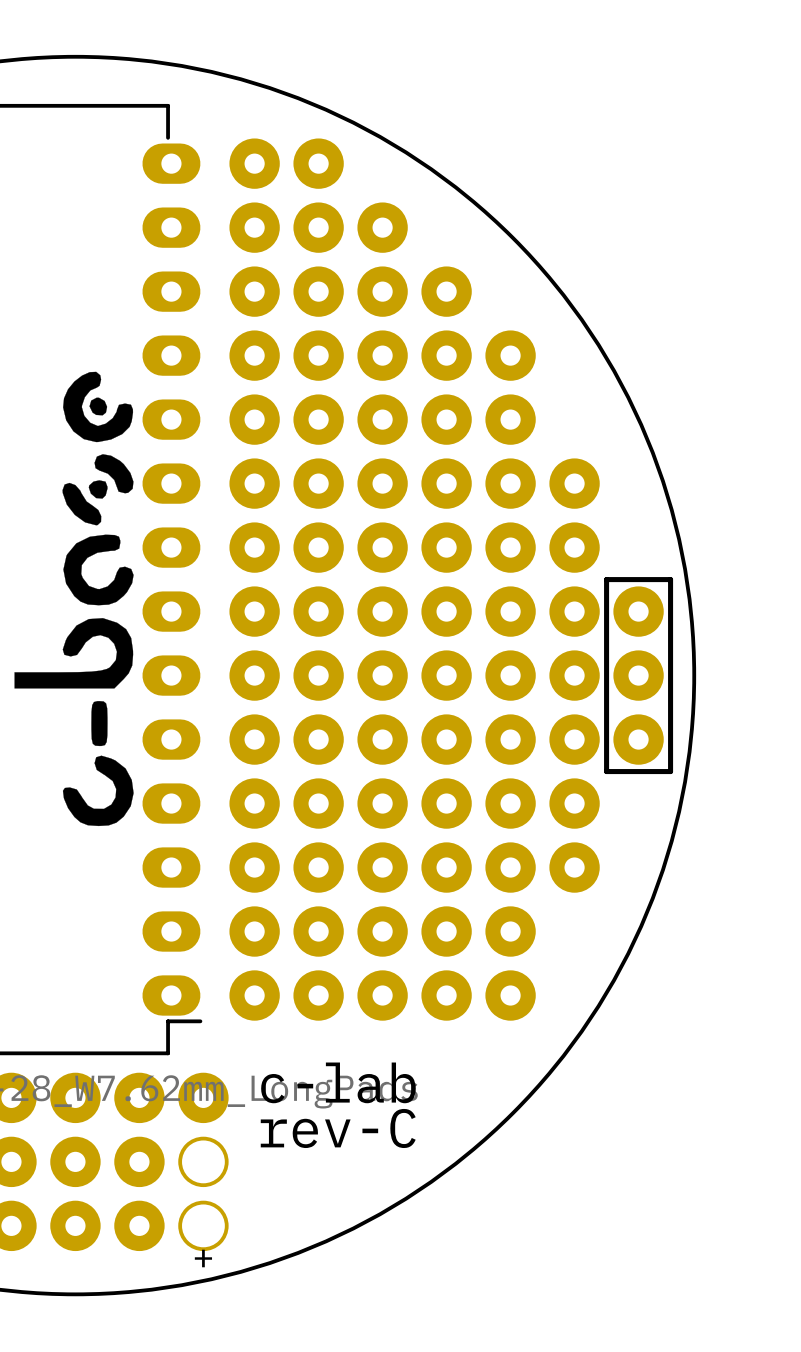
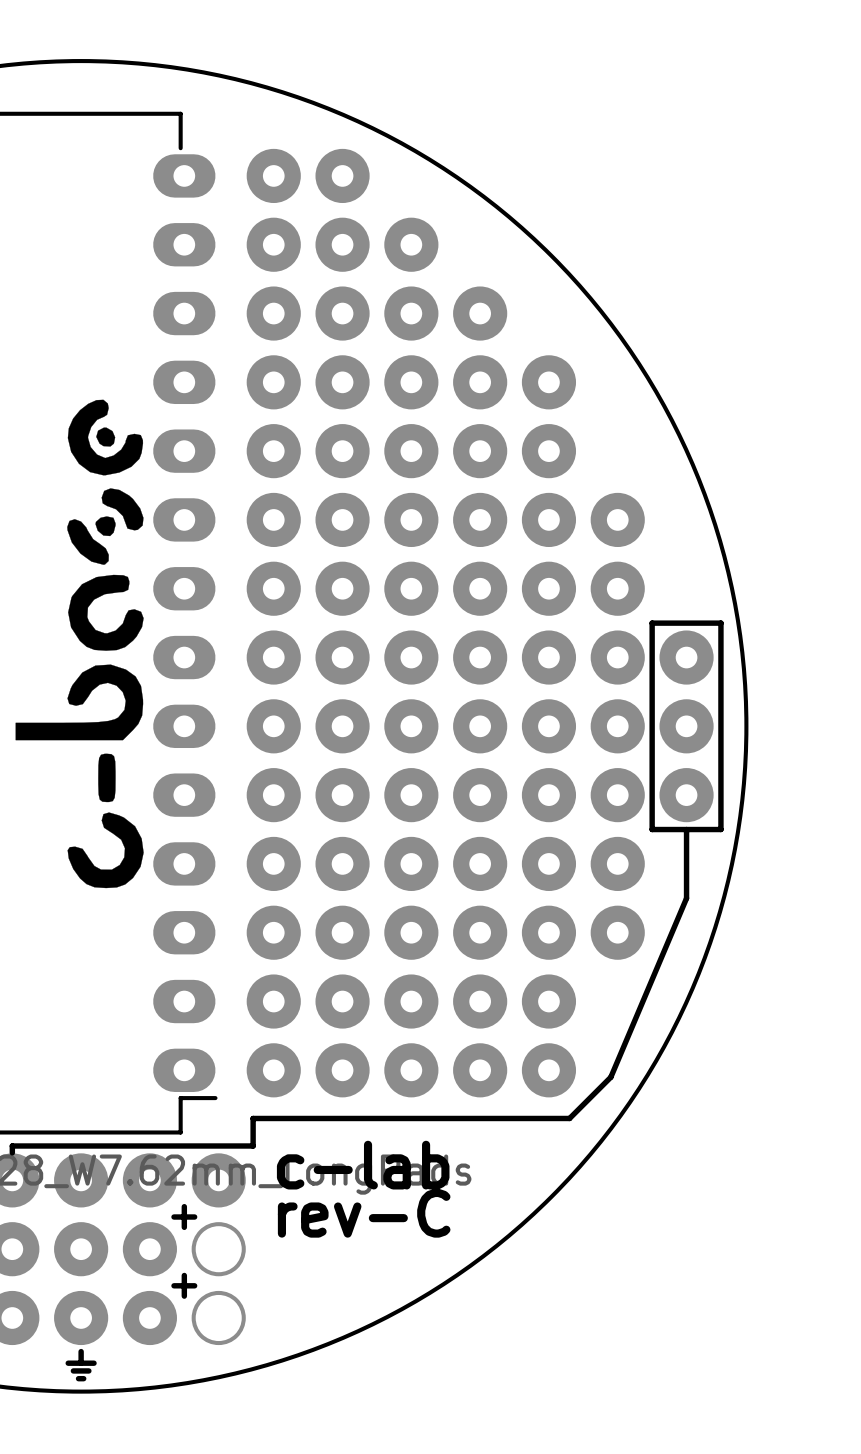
line: none -> (686, 829) (686, 898) (610, 1077) (569, 1118) (253, 1118) (253, 1146) (12, 1146) (12, 1152)
text: none -> + (184, 1217)
text: none -> + (184, 1285)
text: + (203, 1258) -> none
text: none -> ⏚ (81, 1365)

